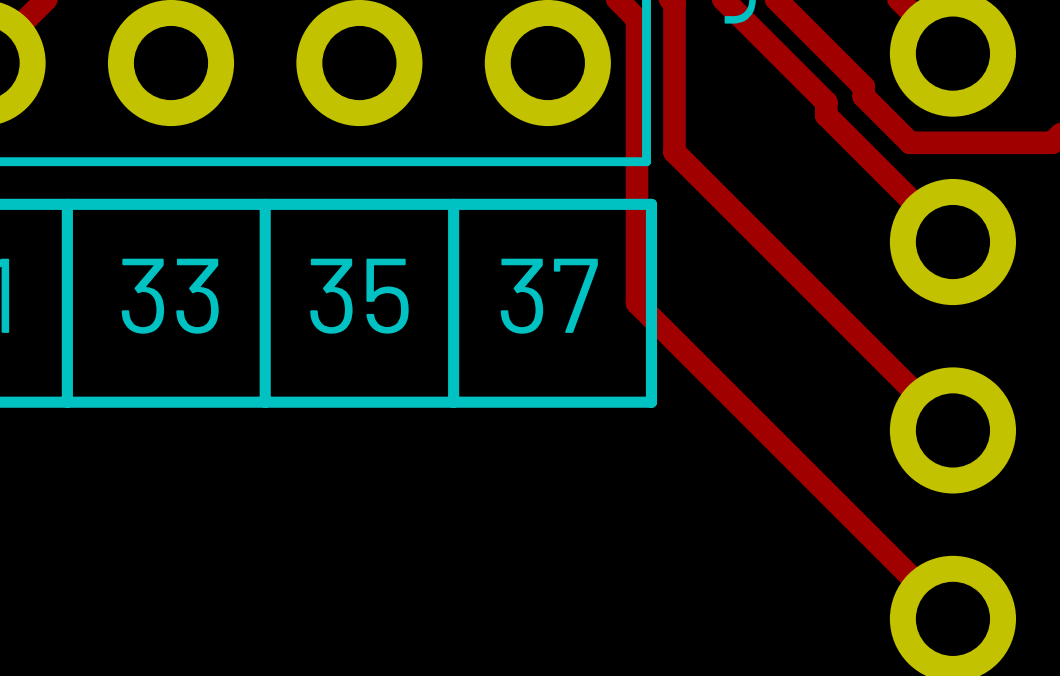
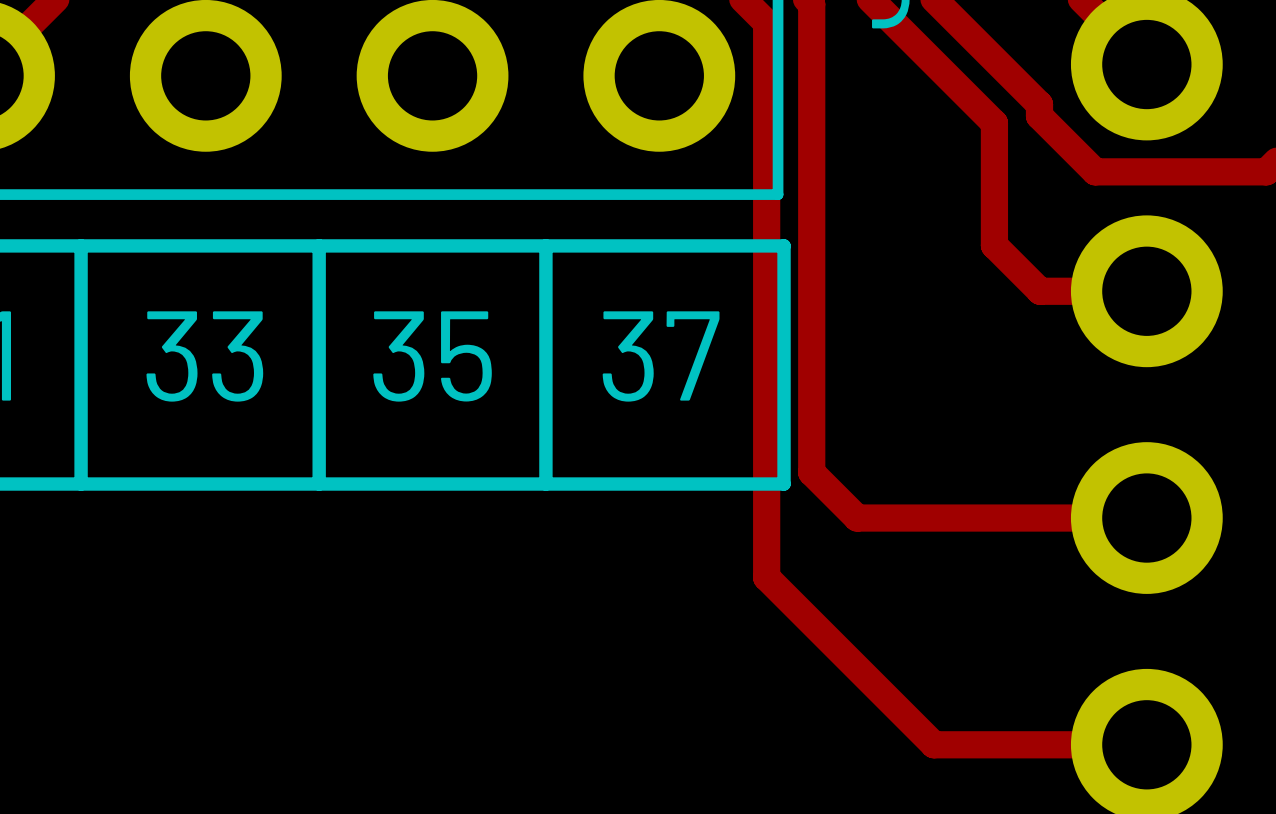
track: (826, 115) (952, 242) -> (994, 138) (994, 245) (1040, 291) (1146, 291)
track: (674, 151) (952, 430) -> (811, 182) (811, 472) (857, 518) (1146, 518)
track: (637, 302) (952, 618) -> (766, 364) (766, 577) (934, 744) (1146, 744)

